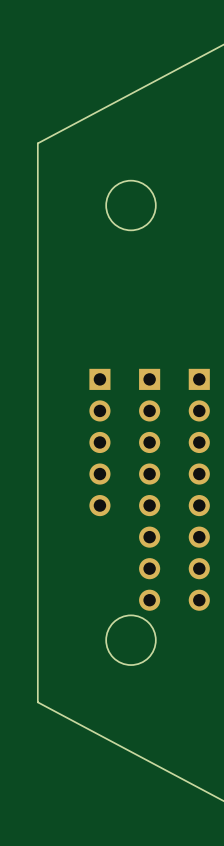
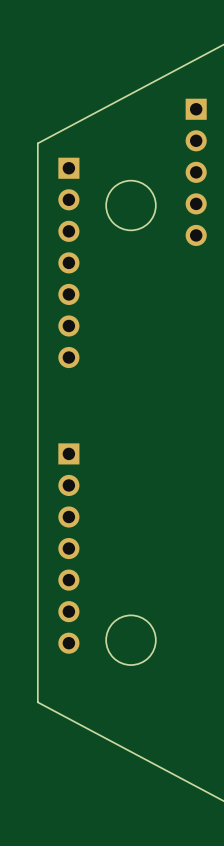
part: none -> (68, 262)
part position: (99, 442) -> (196, 172)
part: (149, 489) -> none
part: (199, 489) -> none
part: none -> (68, 548)

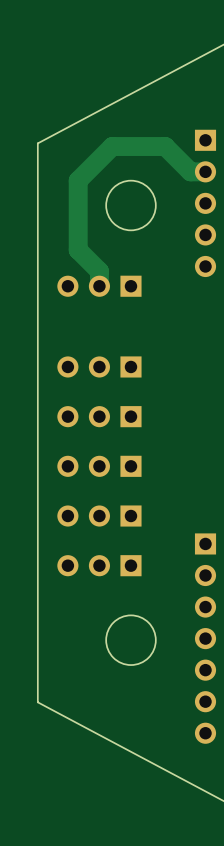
track: none -> (205, 171) (190, 171) (165, 146) (112, 146) (78, 180) (78, 250) (99, 271) (99, 286)
part position: (196, 172) -> (205, 203)
part: (68, 262) -> none
part: none -> (99, 286)
part: none -> (99, 366)
part: none -> (99, 416)
part: none -> (99, 466)
part: none -> (99, 516)
part position: (68, 548) -> (205, 638)
part: none -> (99, 565)

